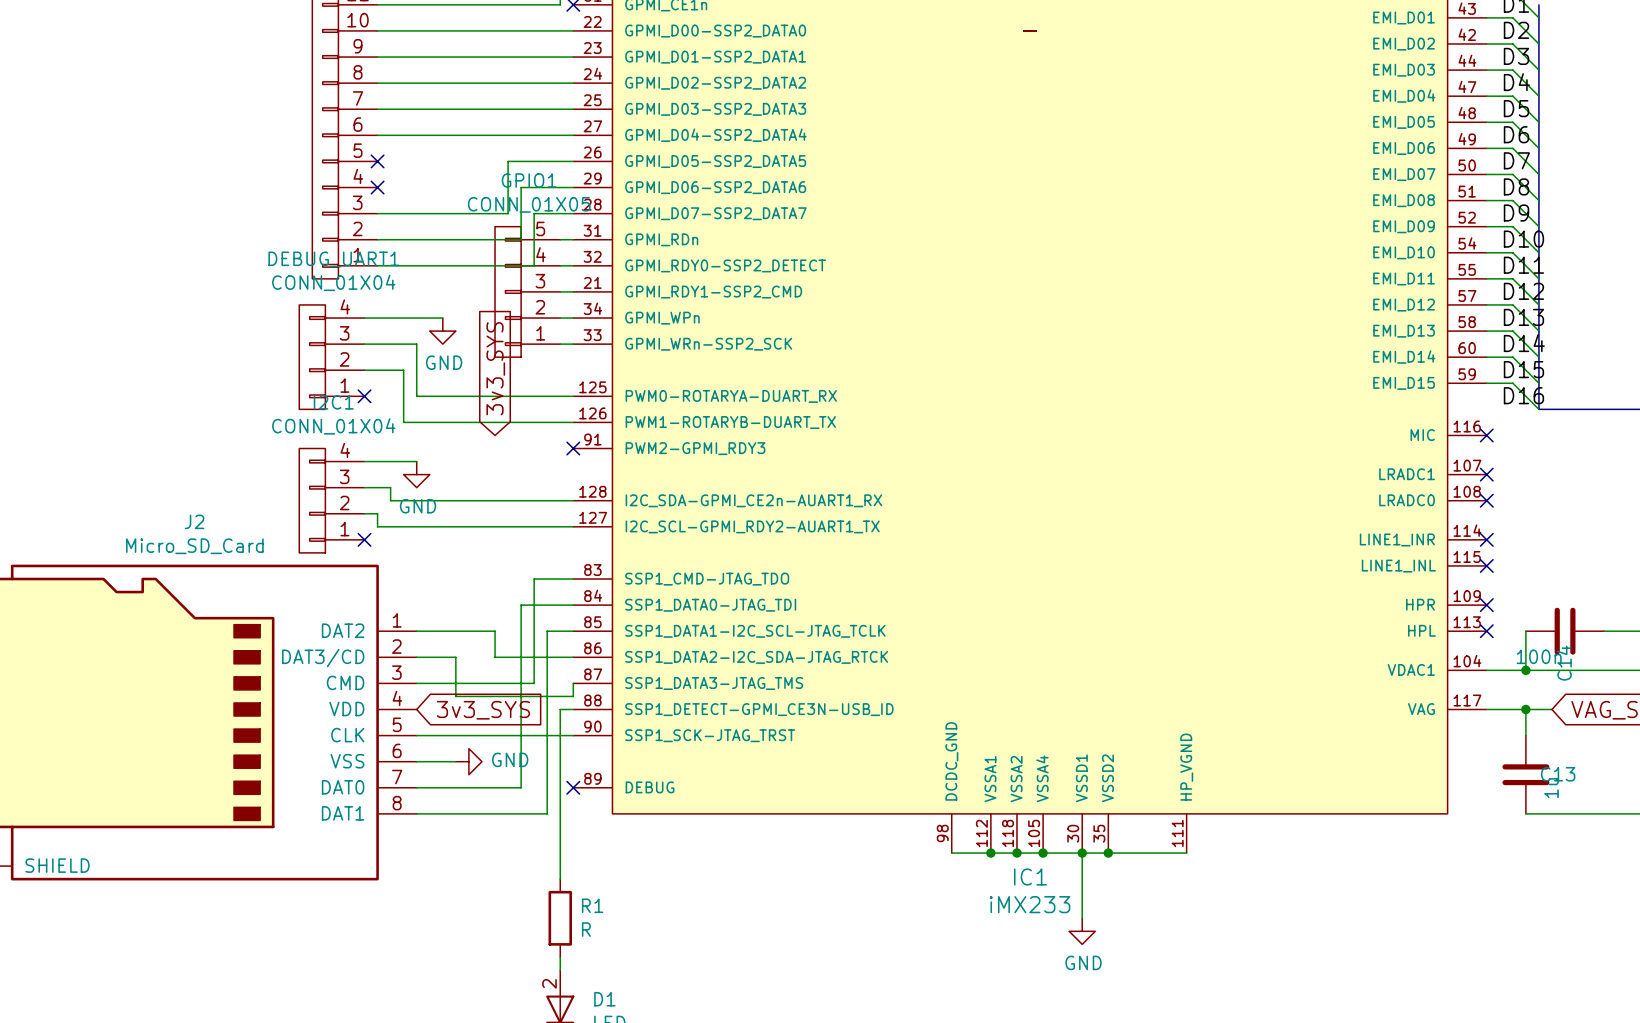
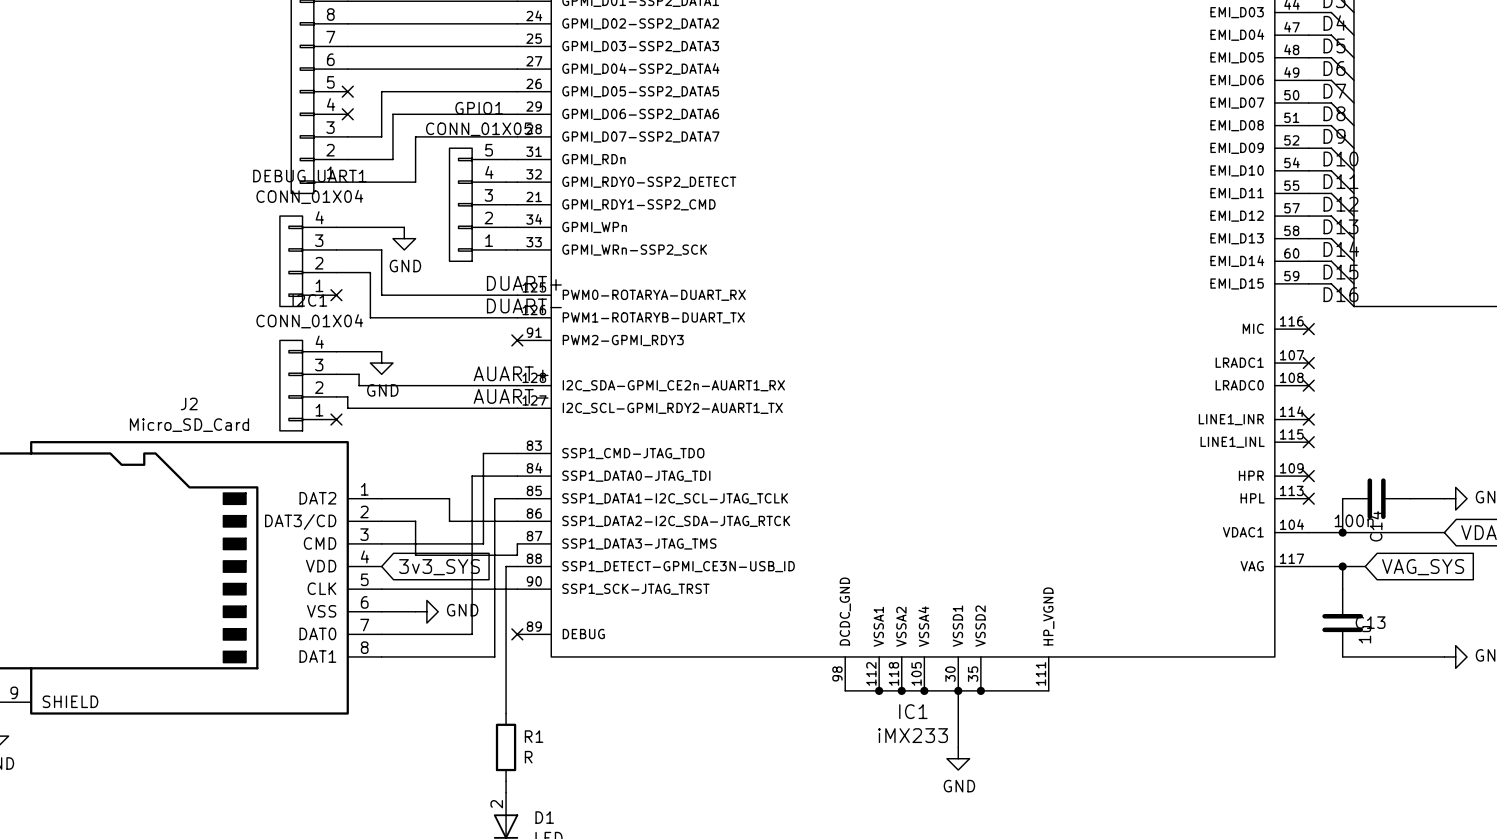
wire: (508, 161) (508, 213) -> (483, 136) (460, 136)
wire: none -> (460, 91) (381, 91) (381, 136)
wire: (521, 187) (521, 239) (429, 239) -> (472, 114) (392, 114) (392, 159)
wire: (416, 213) (455, 213) -> (415, 182) (415, 136)
wire: (534, 213) (534, 265) (455, 265) -> none
global label: 3v3_SYS (495, 368) -> none
label: none -> DUART+ (524, 283)
label: none -> DUART- (524, 305)
label: none -> AUART+ (511, 373)
label: none -> AUART- (511, 396)

